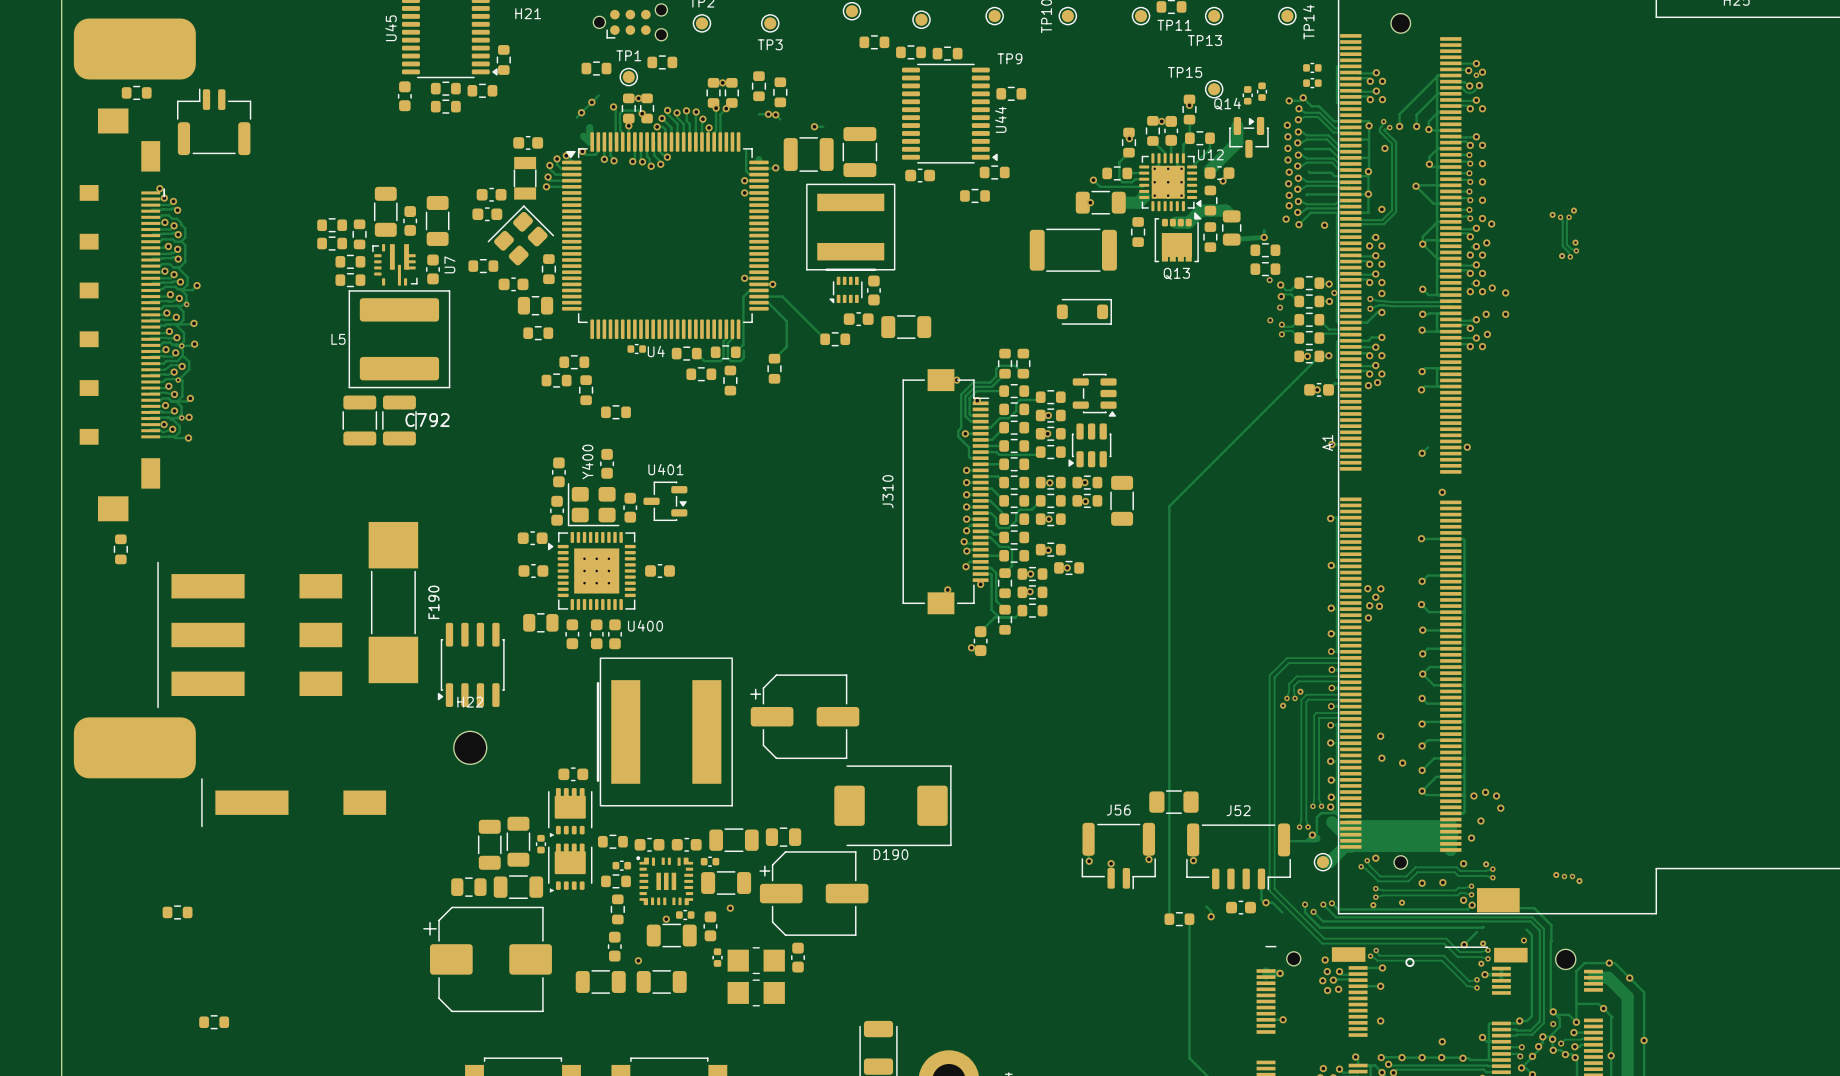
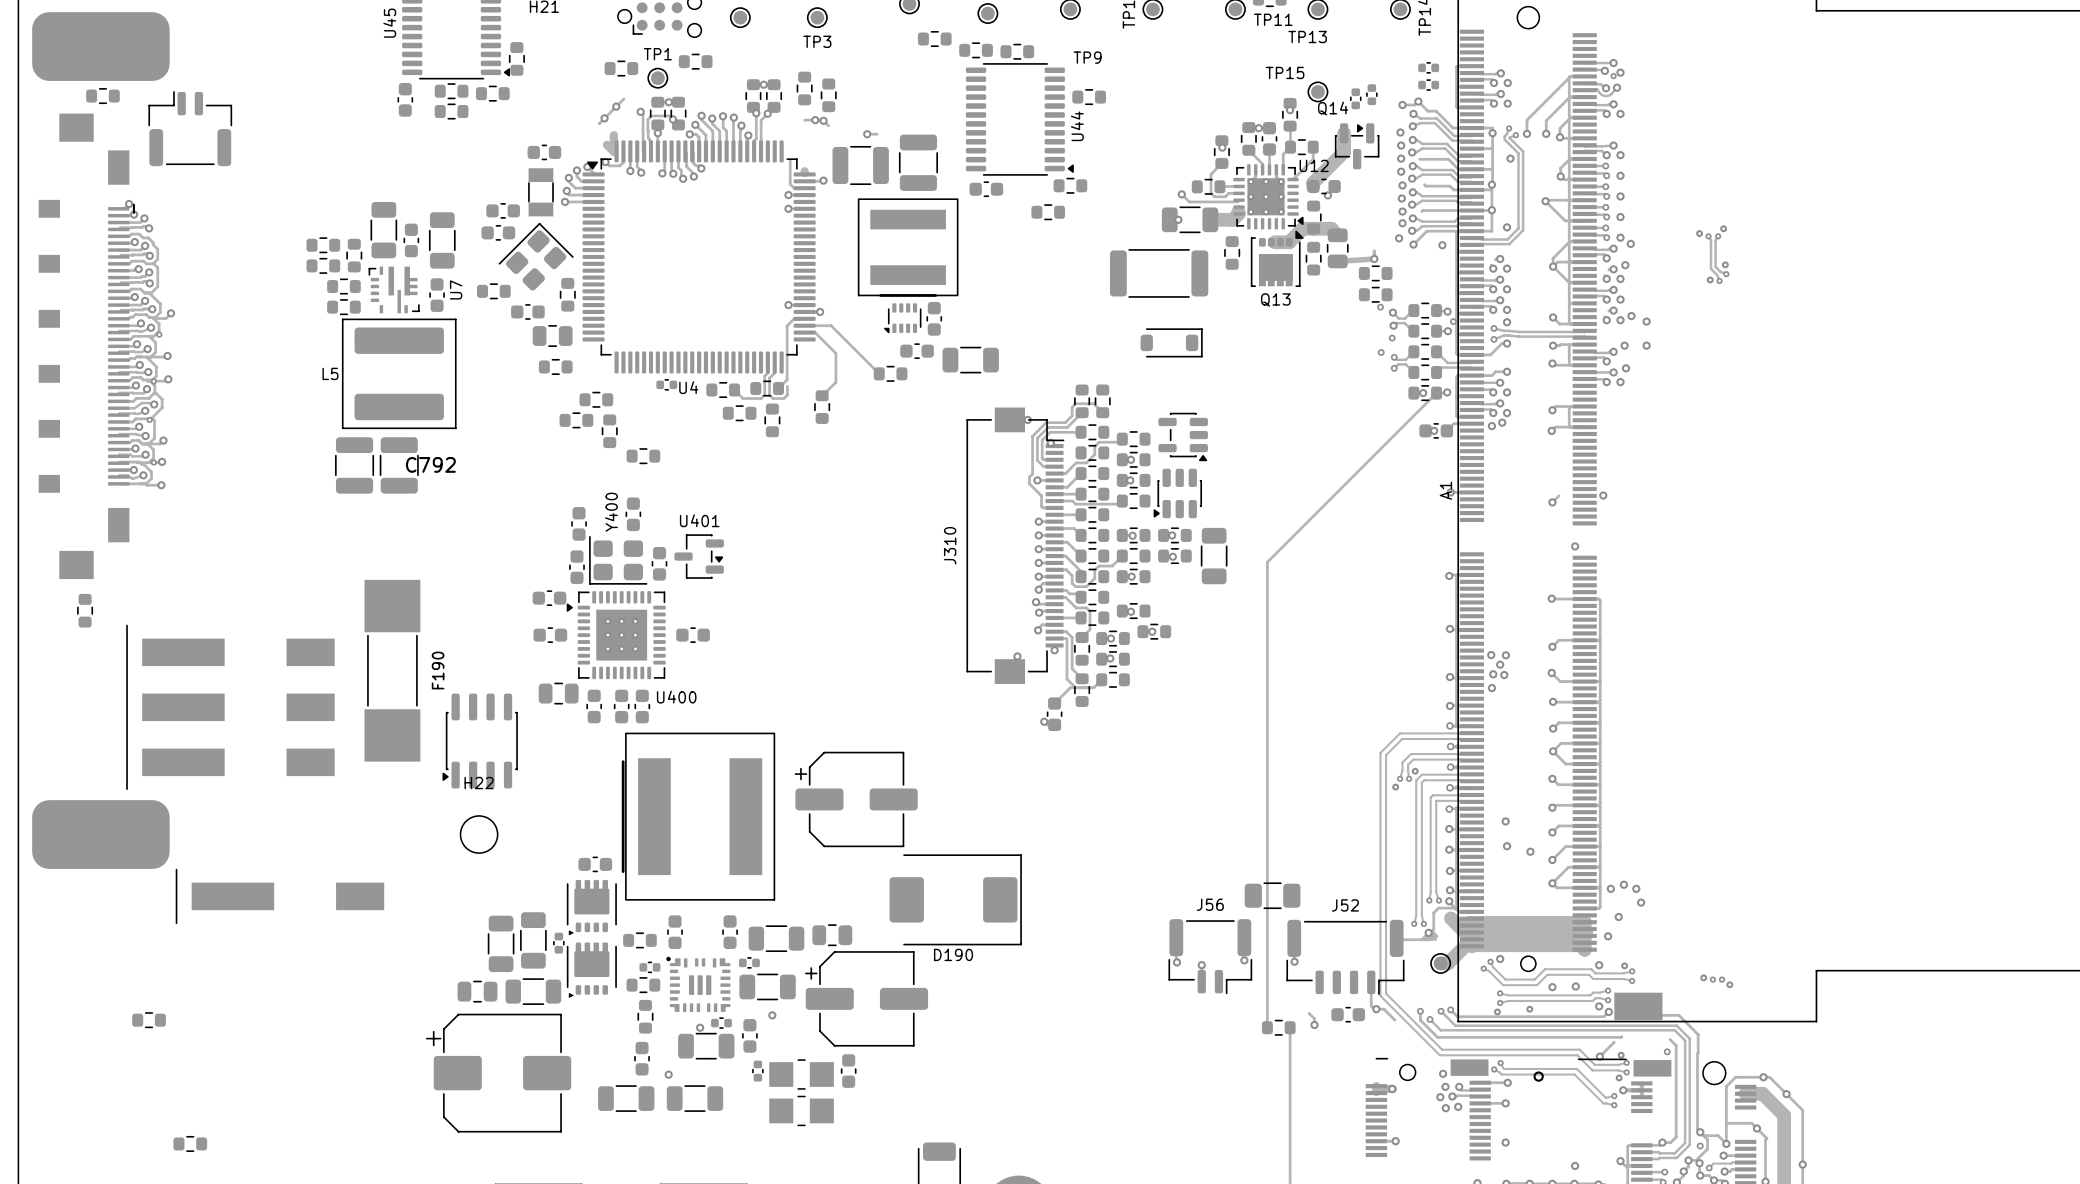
part rotation: 0° (649, 844) -> 90° clockwise (675, 932)
part rotation: 0° (686, 844) -> 90° clockwise (730, 932)

